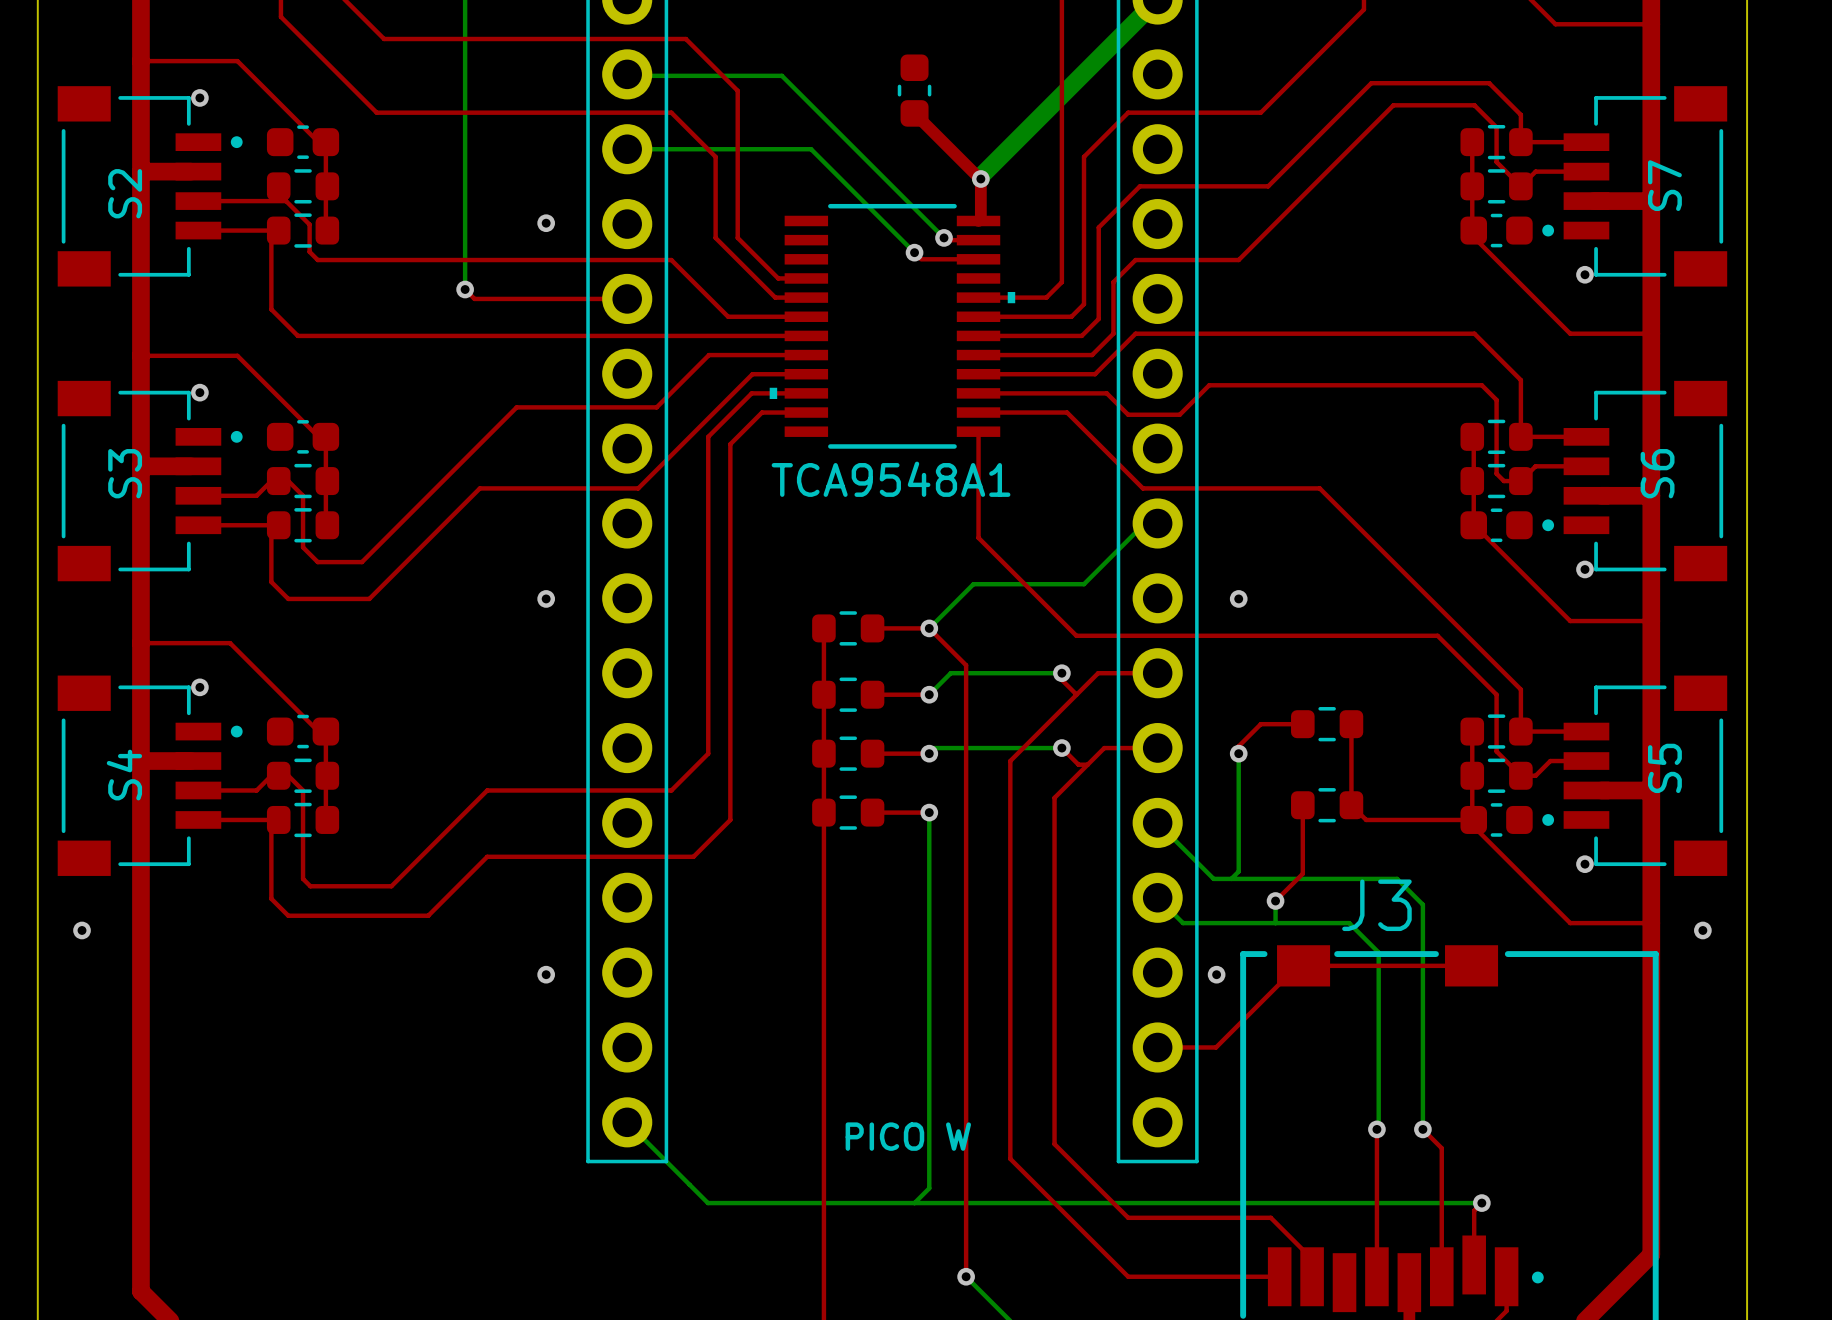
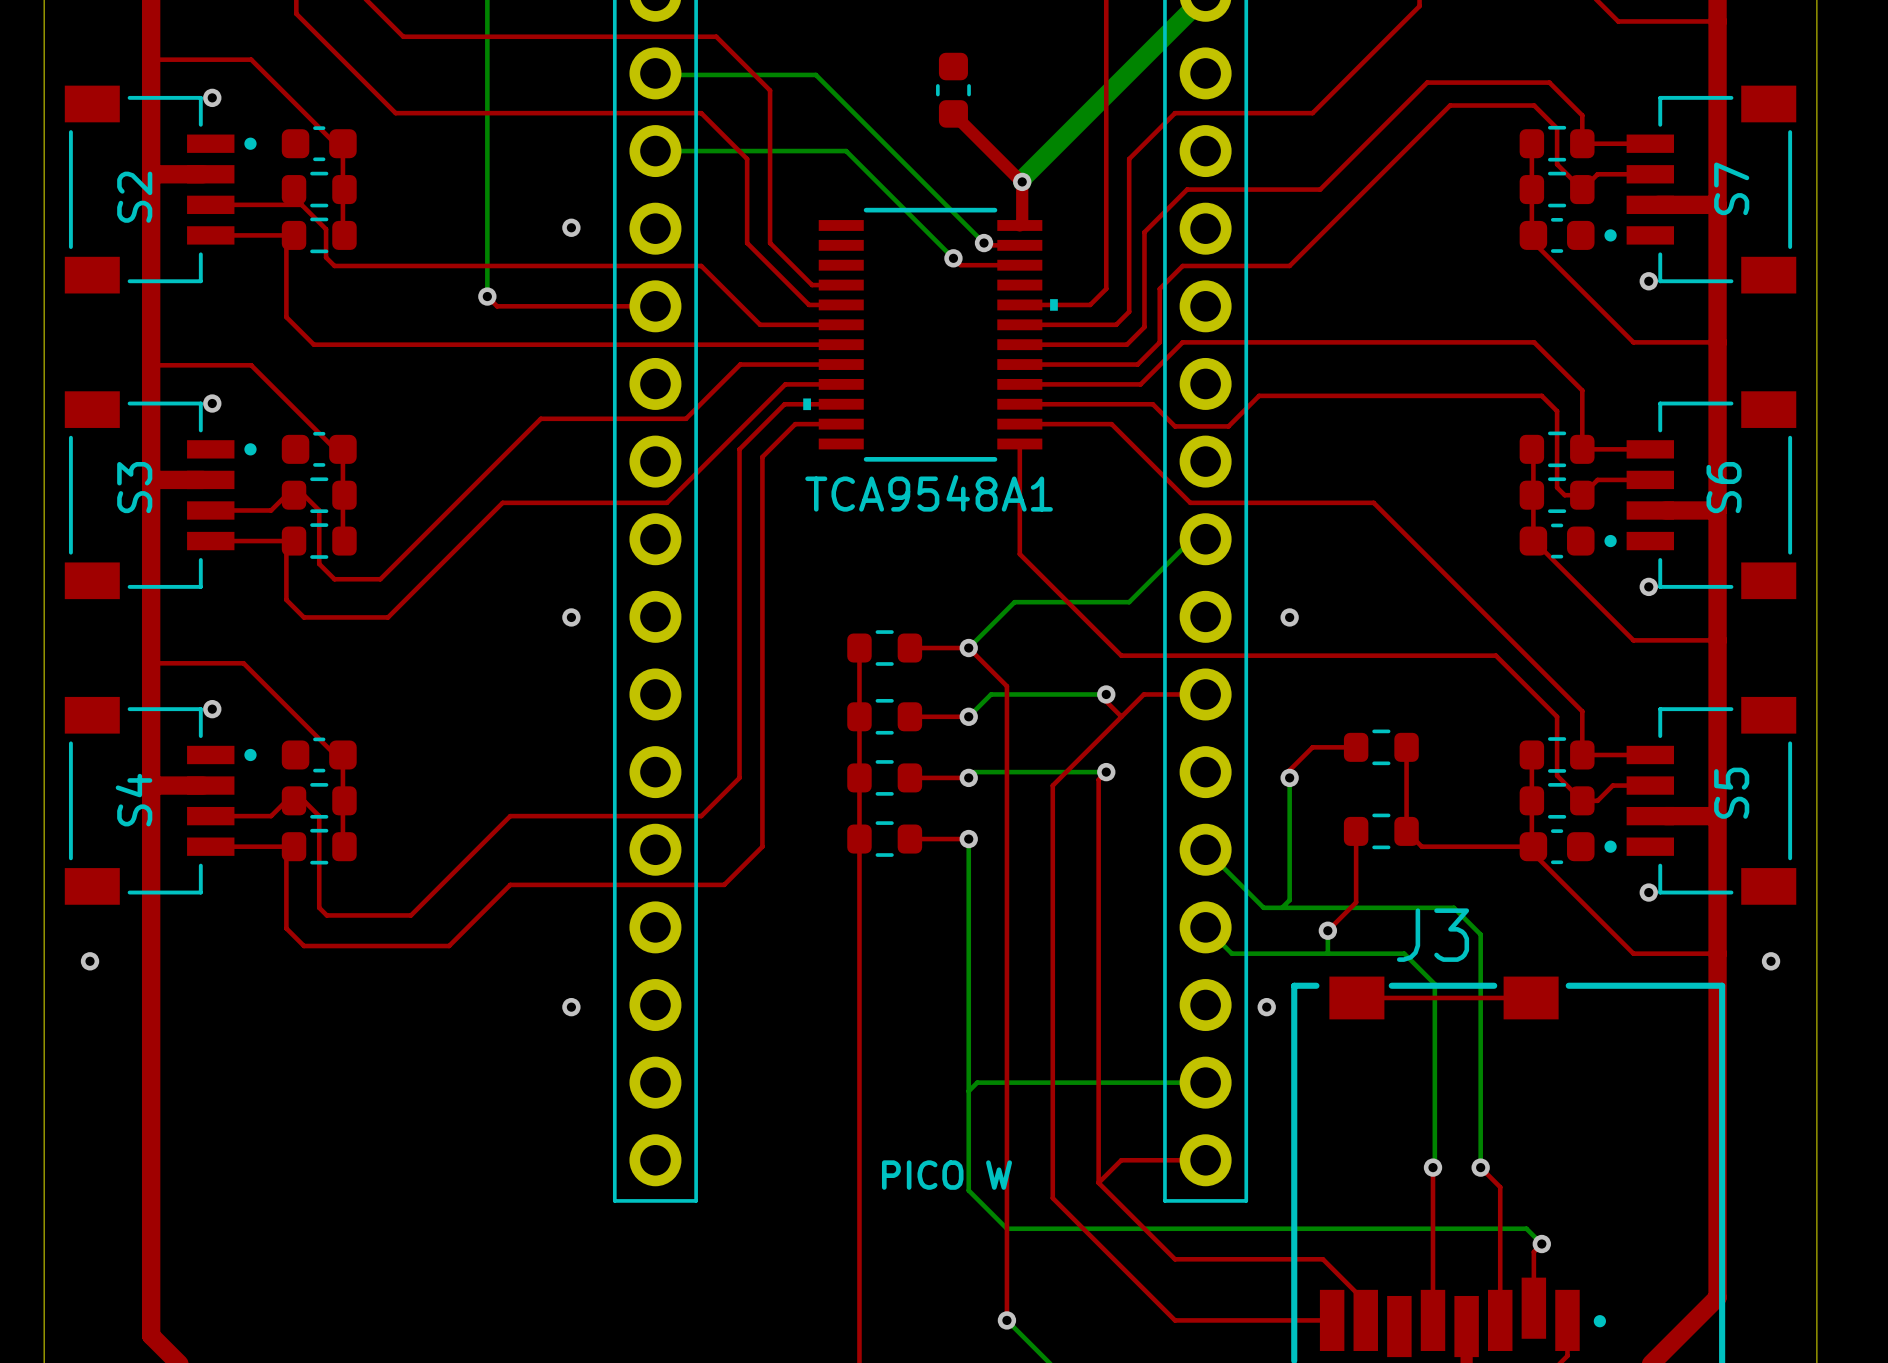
top track: (1061, 748) (1078, 764) (1087, 764) -> (1106, 772) (1098, 779) (1098, 823)
top track: (1157, 748) (1104, 748) (1054, 797) -> none
top track: (1297, 965) (1216, 1047) (1157, 1047) -> none
bottom track: none -> (1205, 1082) (977, 1082) (968, 1091)
bottom track: (627, 1122) (707, 1203) (1481, 1203) -> (968, 1190) (1006, 1228) (1526, 1228) (1541, 1244)
top track: none -> (1205, 1160) (1121, 1160) (1098, 1182)
bottom track: (929, 1151) (929, 1188) (914, 1203) -> none

